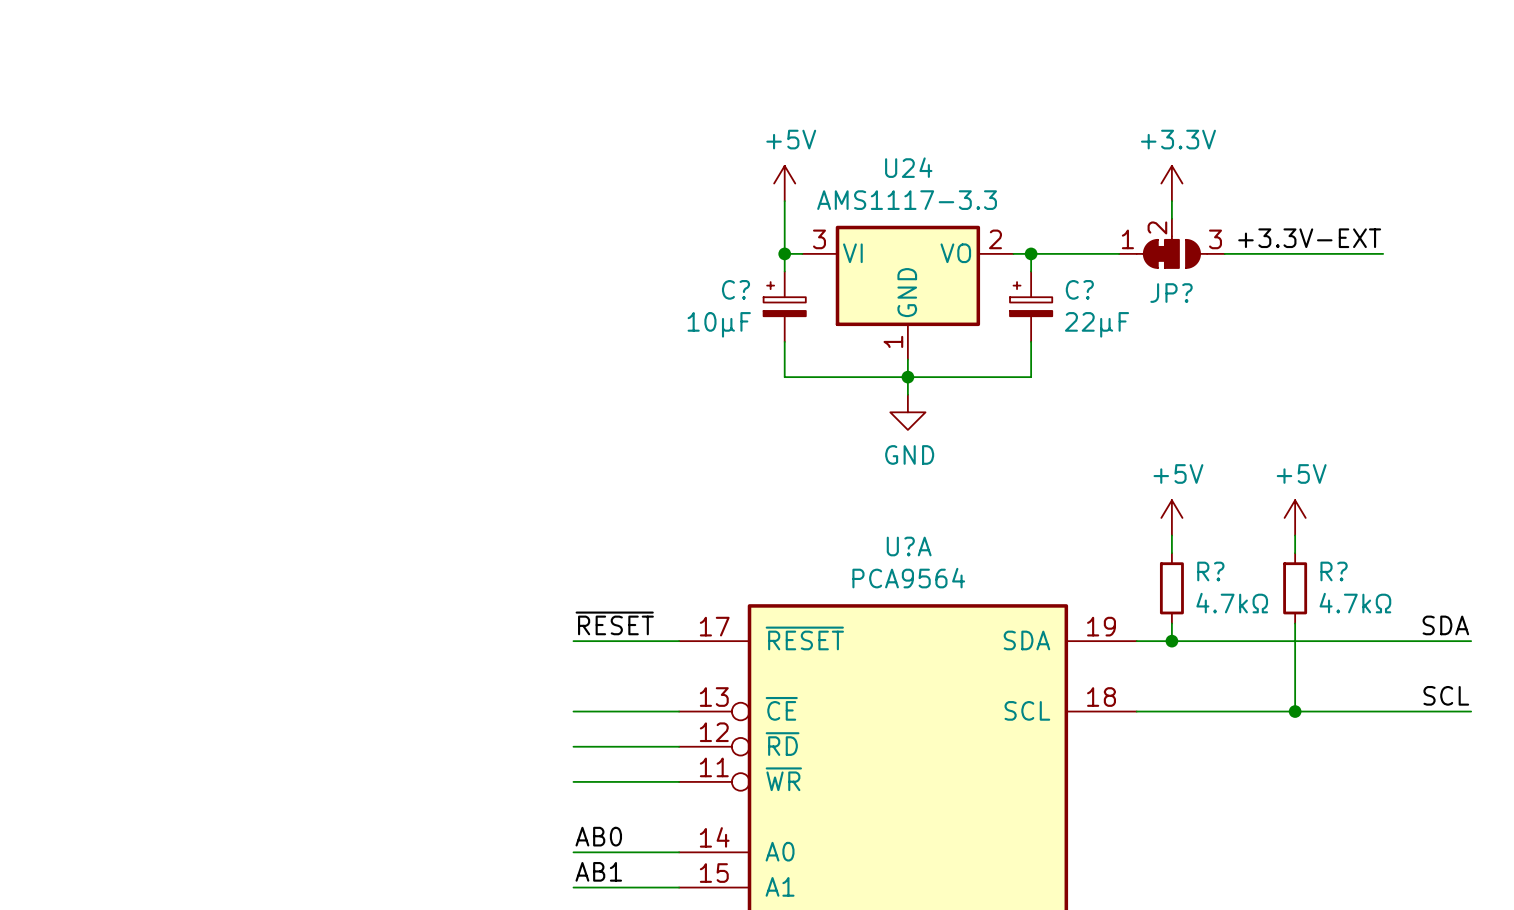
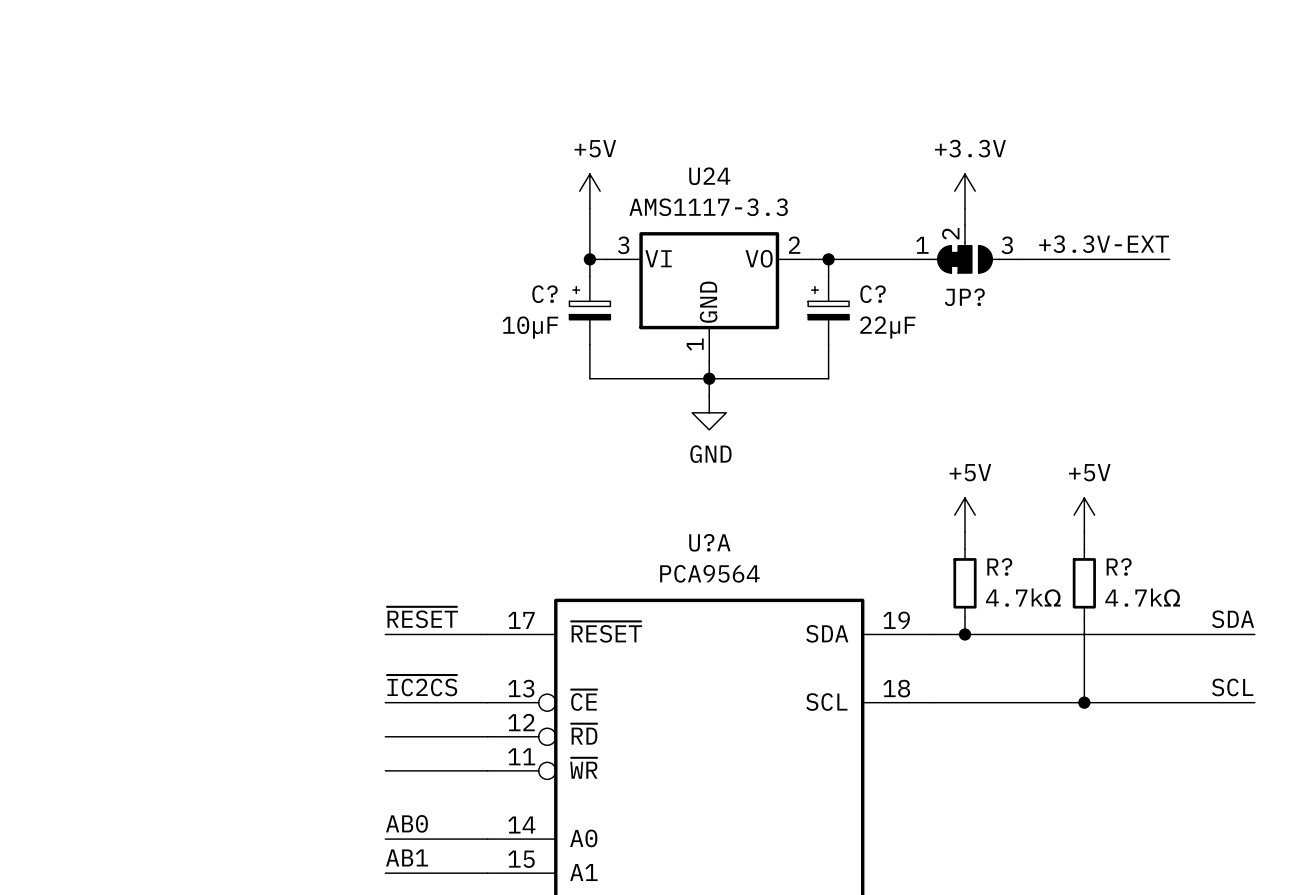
label: none -> ~{IC2CS} (422, 685)

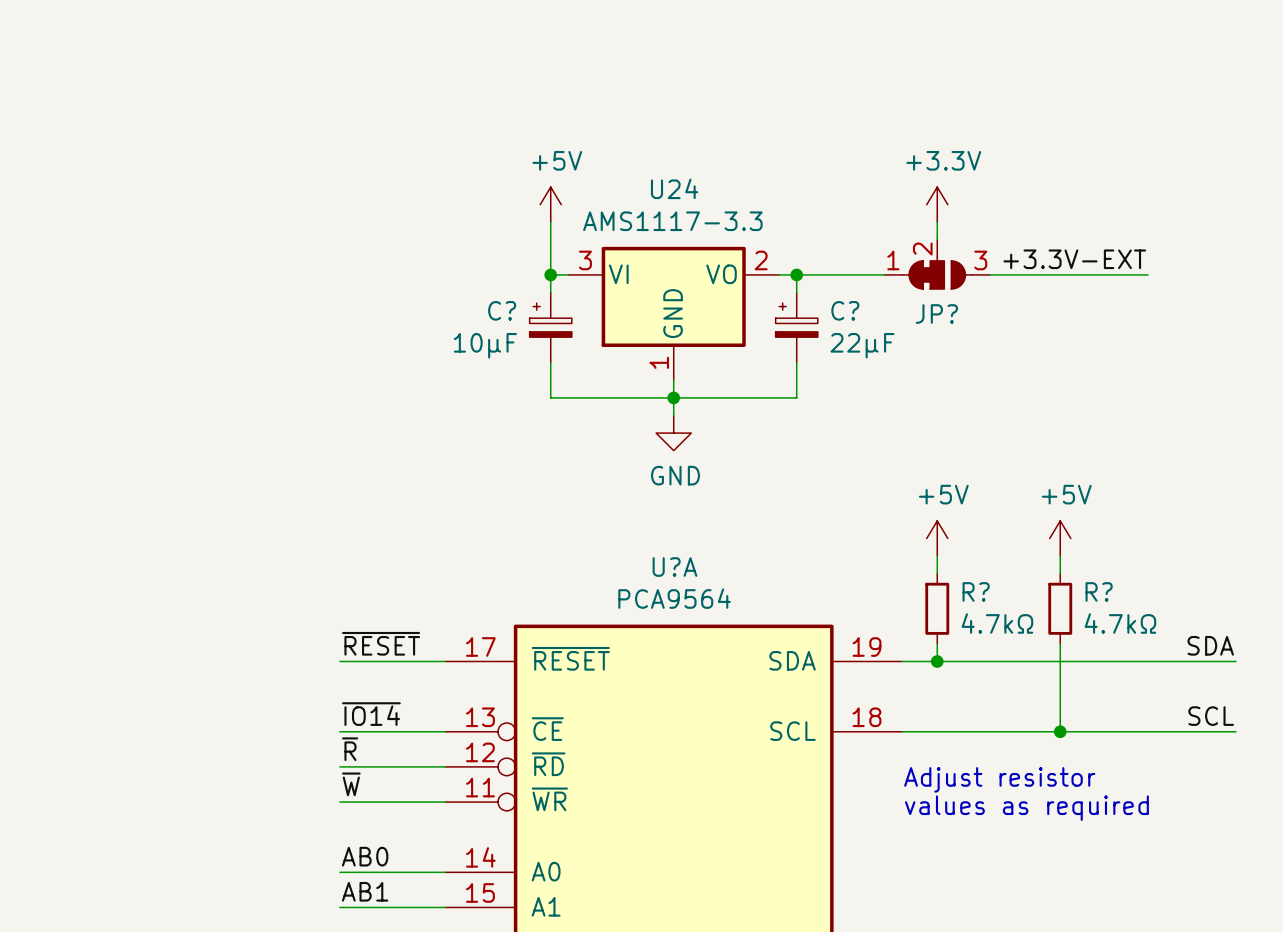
label: ~{IC2CS} (422, 685) -> ~{IO14} (371, 714)
label: none -> ~{R} (350, 749)
text: none -> Adjust resistor (999, 779)
label: none -> ~{W} (351, 784)
text: none -> values as required (1026, 808)

